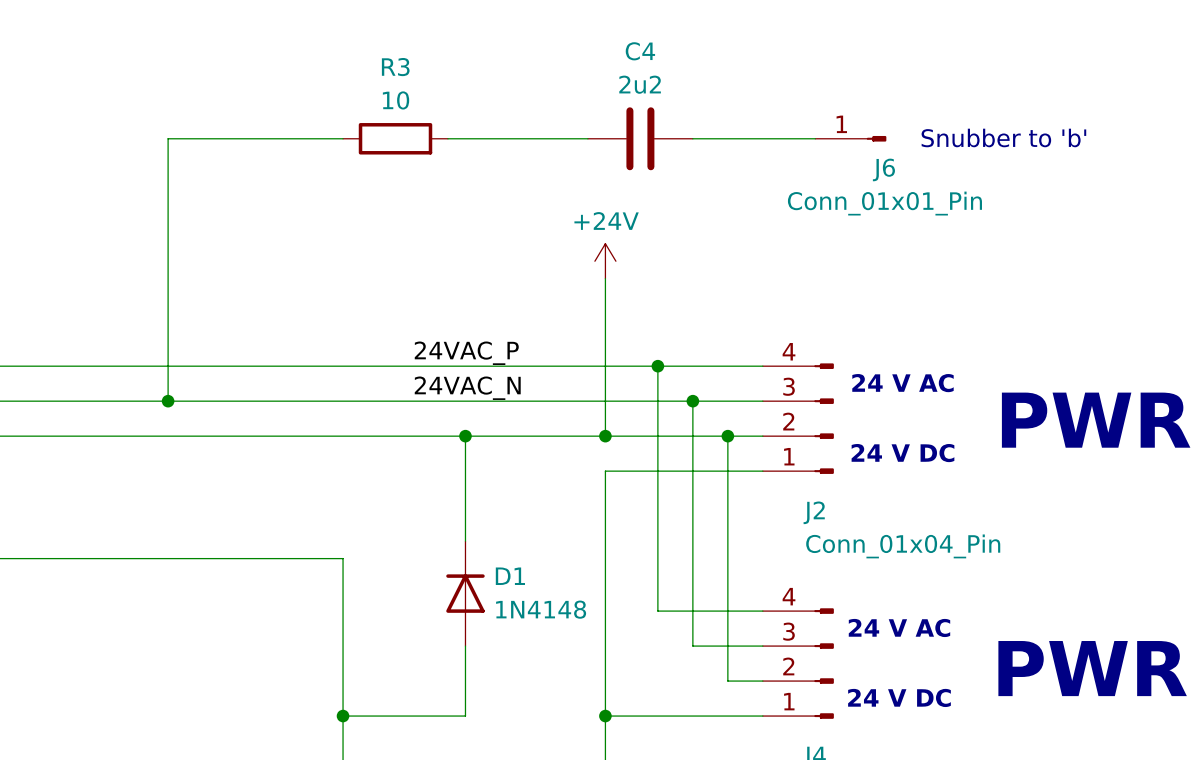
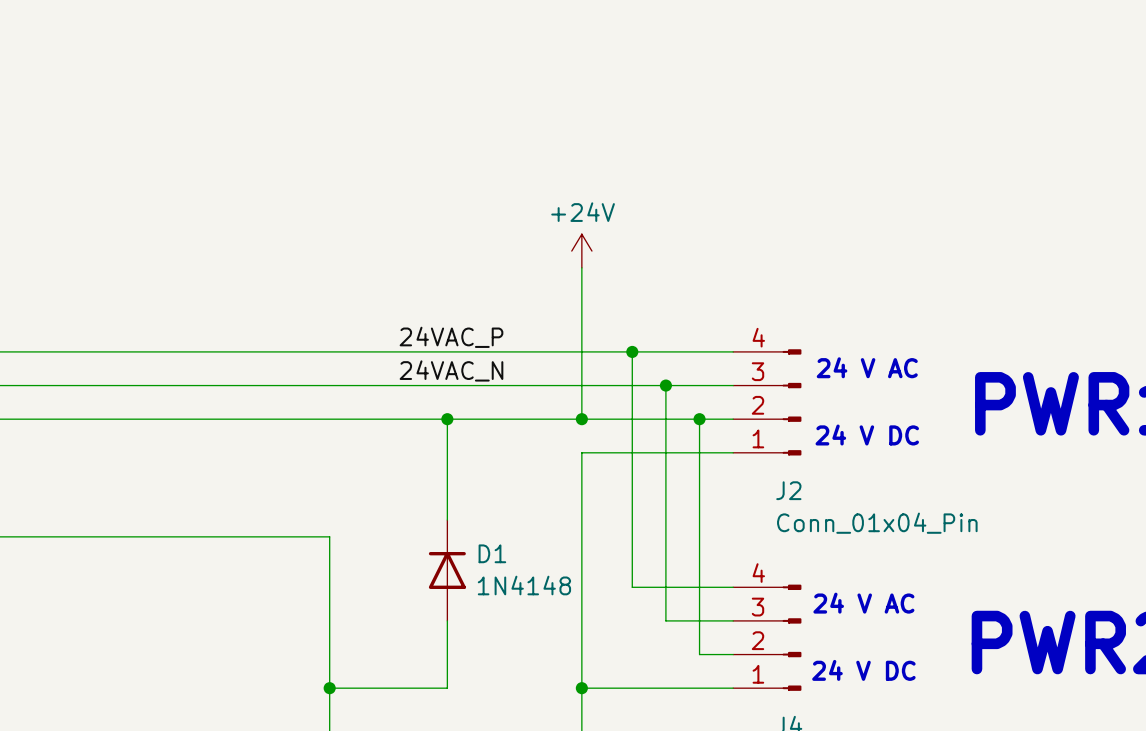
text: Snubber to 'b' (1003, 137) -> none
wire: (343, 138) (168, 138) (168, 401) -> none
R3: 10 (395, 138) -> none
wire: (447, 138) (587, 138) -> none
C4: 2u2 (640, 138) -> none
wire: (692, 138) (815, 138) -> none
J6: Conn_01x01_Pin (850, 138) -> none
junction: (168, 401) -> none

